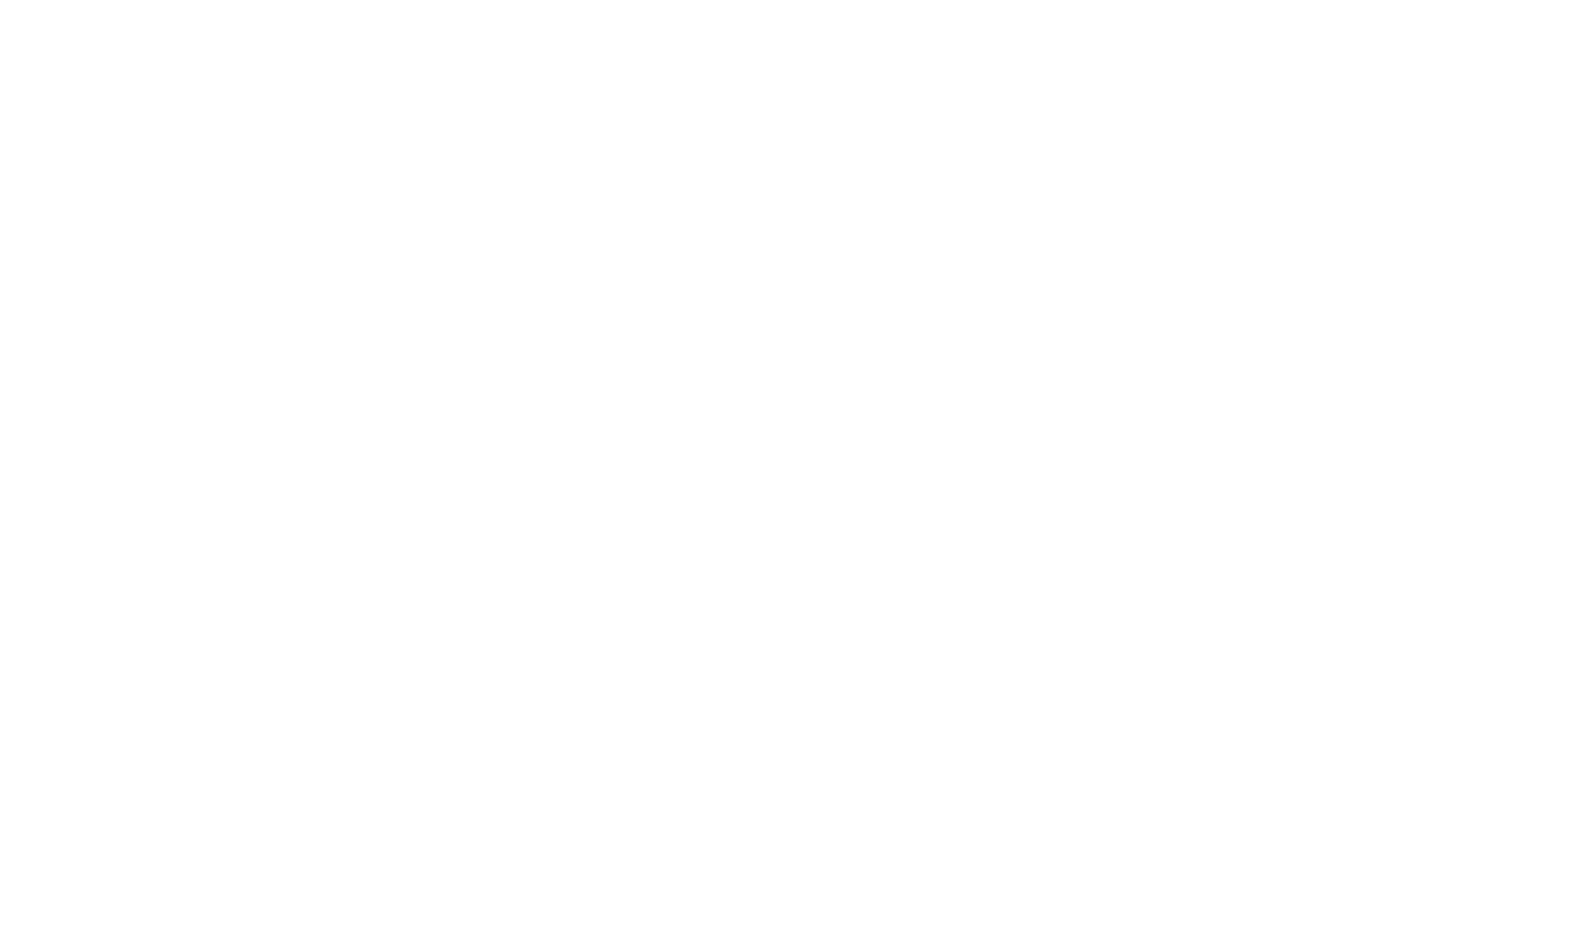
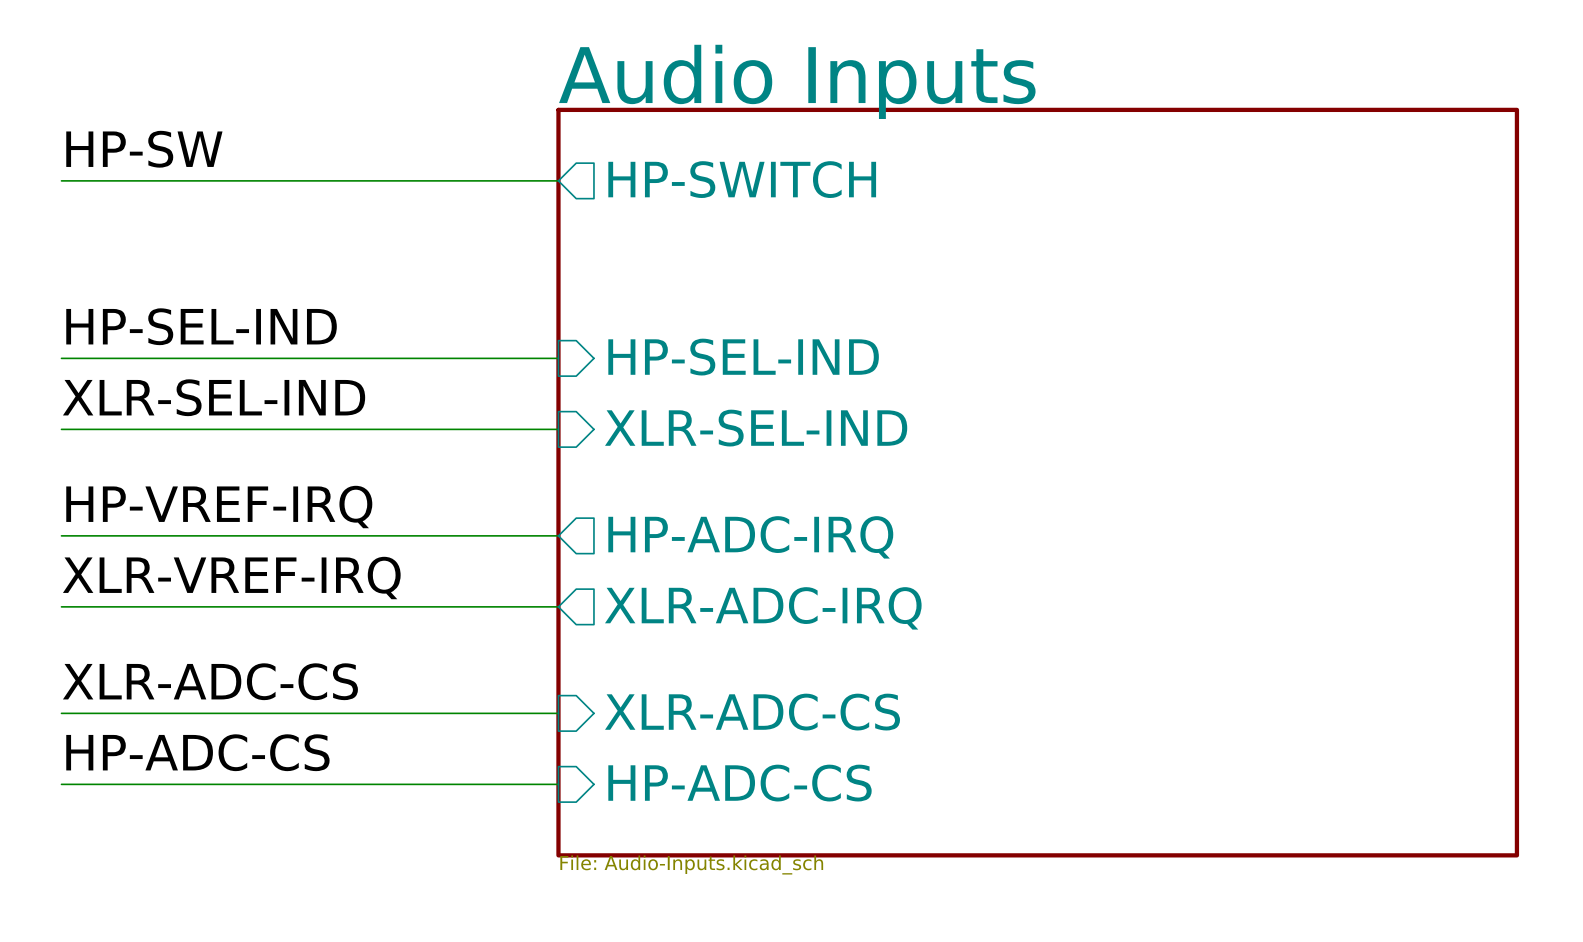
label: none -> HP-SW (144, 149)
sheet pin: none -> HP-SWITCH (742, 179)
wire: none -> (61, 180) (558, 180)
label: none -> HP-SEL-IND (201, 326)
sheet pin: none -> HP-SEL-IND (743, 357)
wire: none -> (61, 358) (558, 358)
label: none -> XLR-SEL-IND (214, 397)
sheet pin: none -> XLR-SEL-IND (756, 428)
wire: none -> (61, 429) (558, 429)
sheet Audio Inputs: none -> File: Audio-Inputs.kicad_sch (1037, 482)
label: none -> HP-VREF-IRQ (219, 507)
wire: none -> (61, 535) (558, 535)
sheet pin: none -> HP-ADC-IRQ (750, 537)
label: none -> XLR-VREF-IRQ (231, 578)
wire: none -> (61, 606) (558, 606)
sheet pin: none -> XLR-ADC-IRQ (763, 608)
label: none -> XLR-ADC-CS (210, 681)
sheet pin: none -> XLR-ADC-CS (752, 712)
wire: none -> (61, 713) (558, 713)
label: none -> HP-ADC-CS (197, 752)
sheet pin: none -> HP-ADC-CS (740, 783)
wire: none -> (61, 784) (558, 784)

